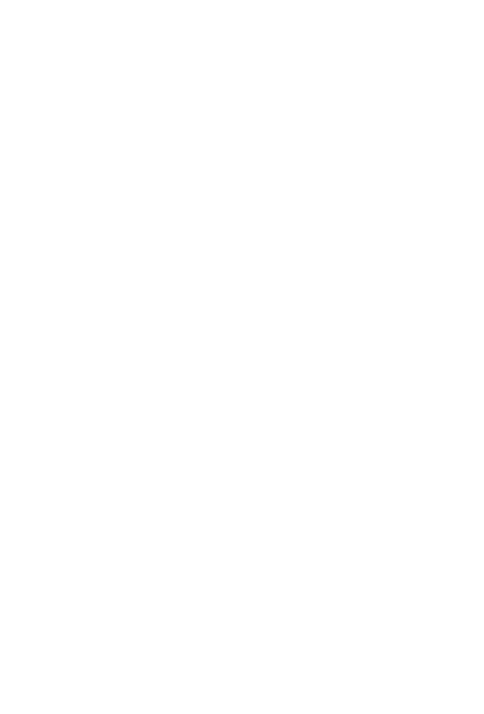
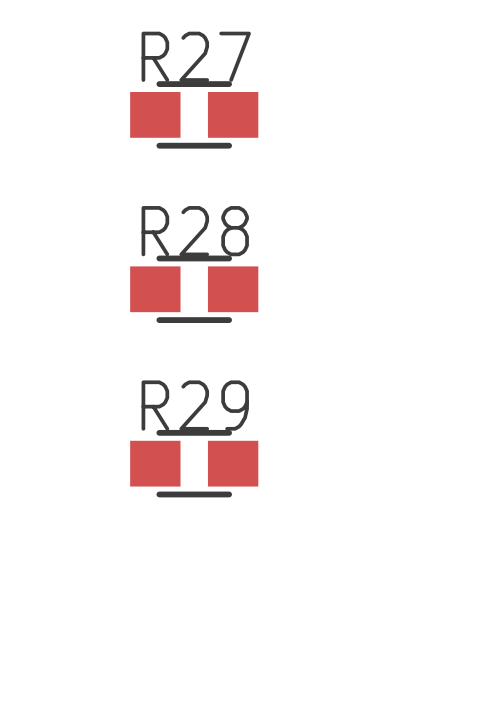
R27: none -> (194, 114)
R28: none -> (194, 289)
R29: none -> (194, 463)

